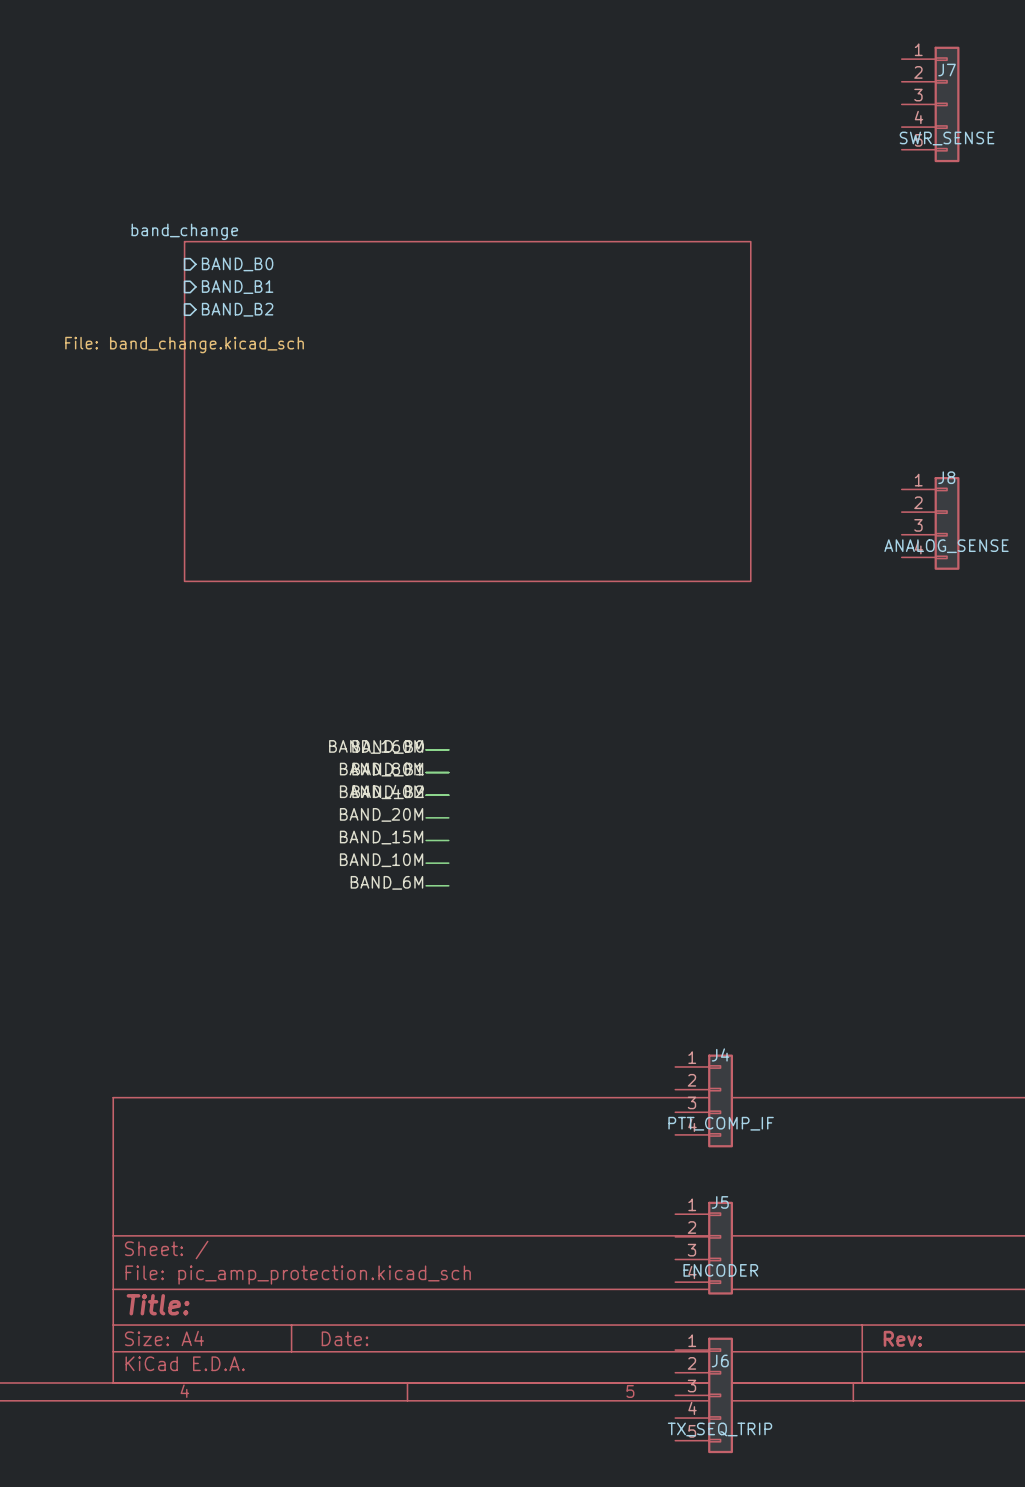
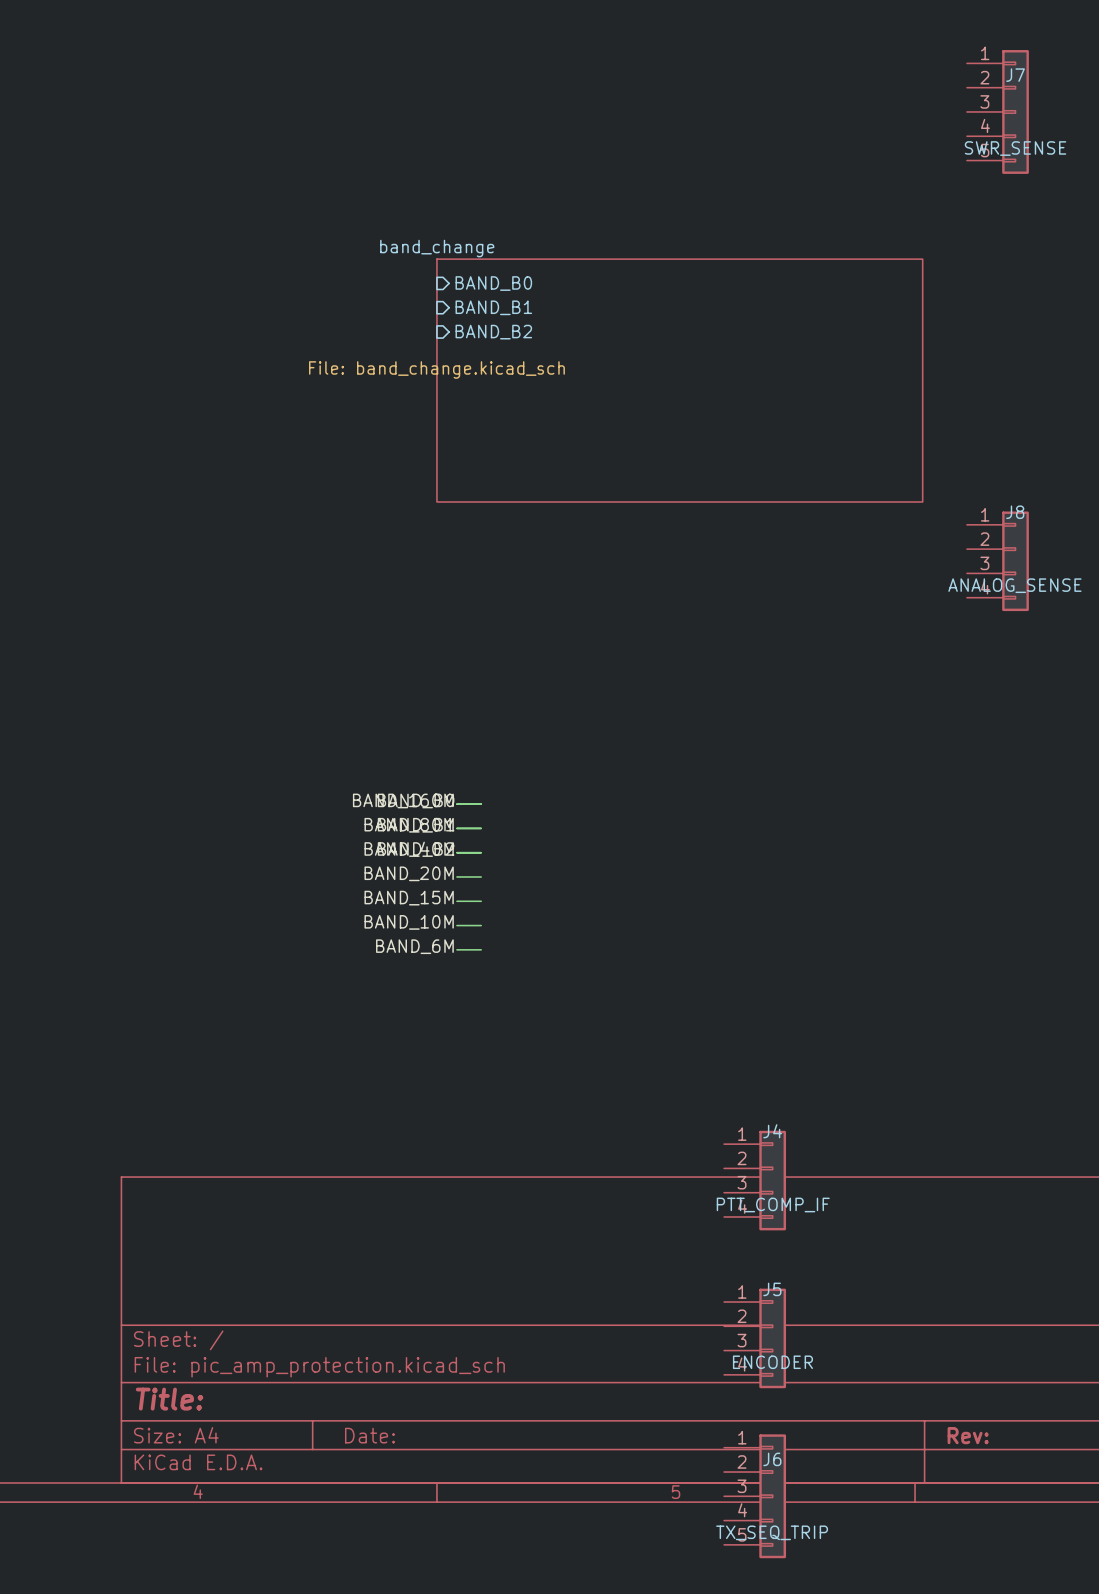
sheet pin position: BAND_B0 (237, 264) -> BAND_B0 (493, 283)
sheet pin position: BAND_B1 (237, 287) -> BAND_B1 (493, 307)
sheet pin position: BAND_B2 (237, 309) -> BAND_B2 (493, 332)
sheet band_change: none -> File: band_change.kicad_sch (679, 380)
sheet band_change: File: band_change.kicad_sch (467, 411) -> none

